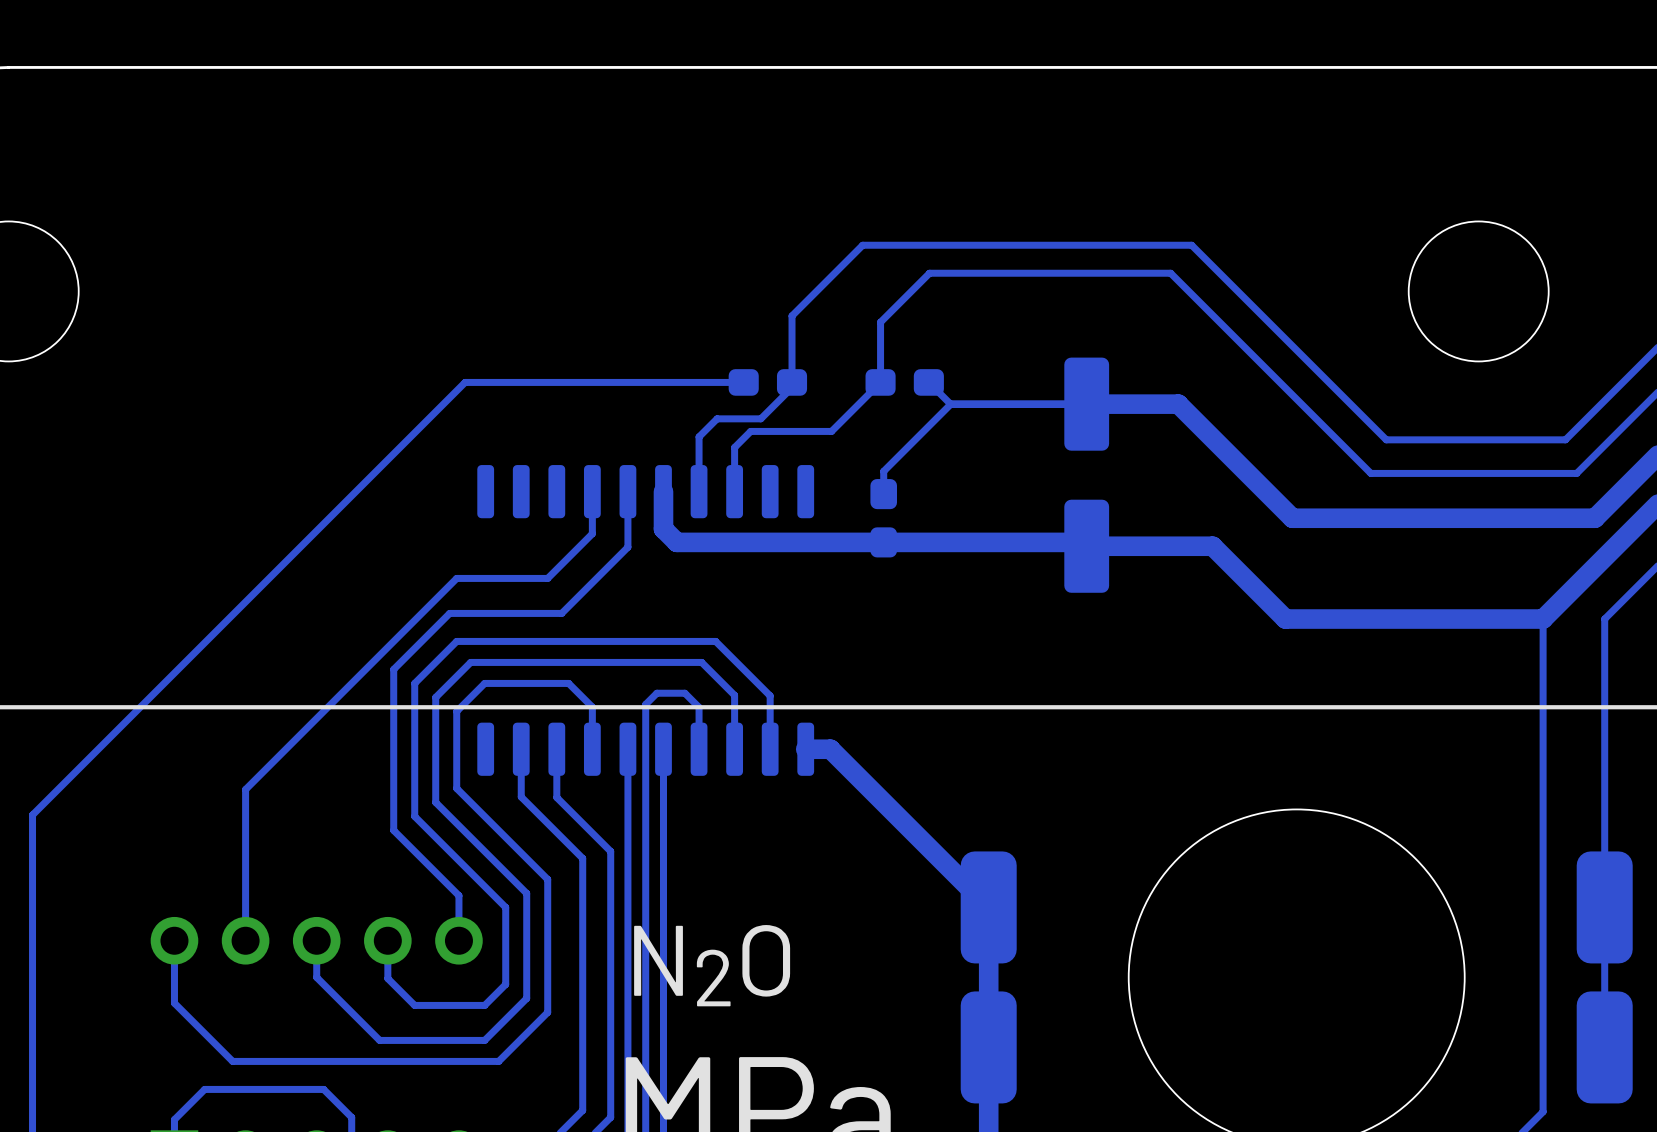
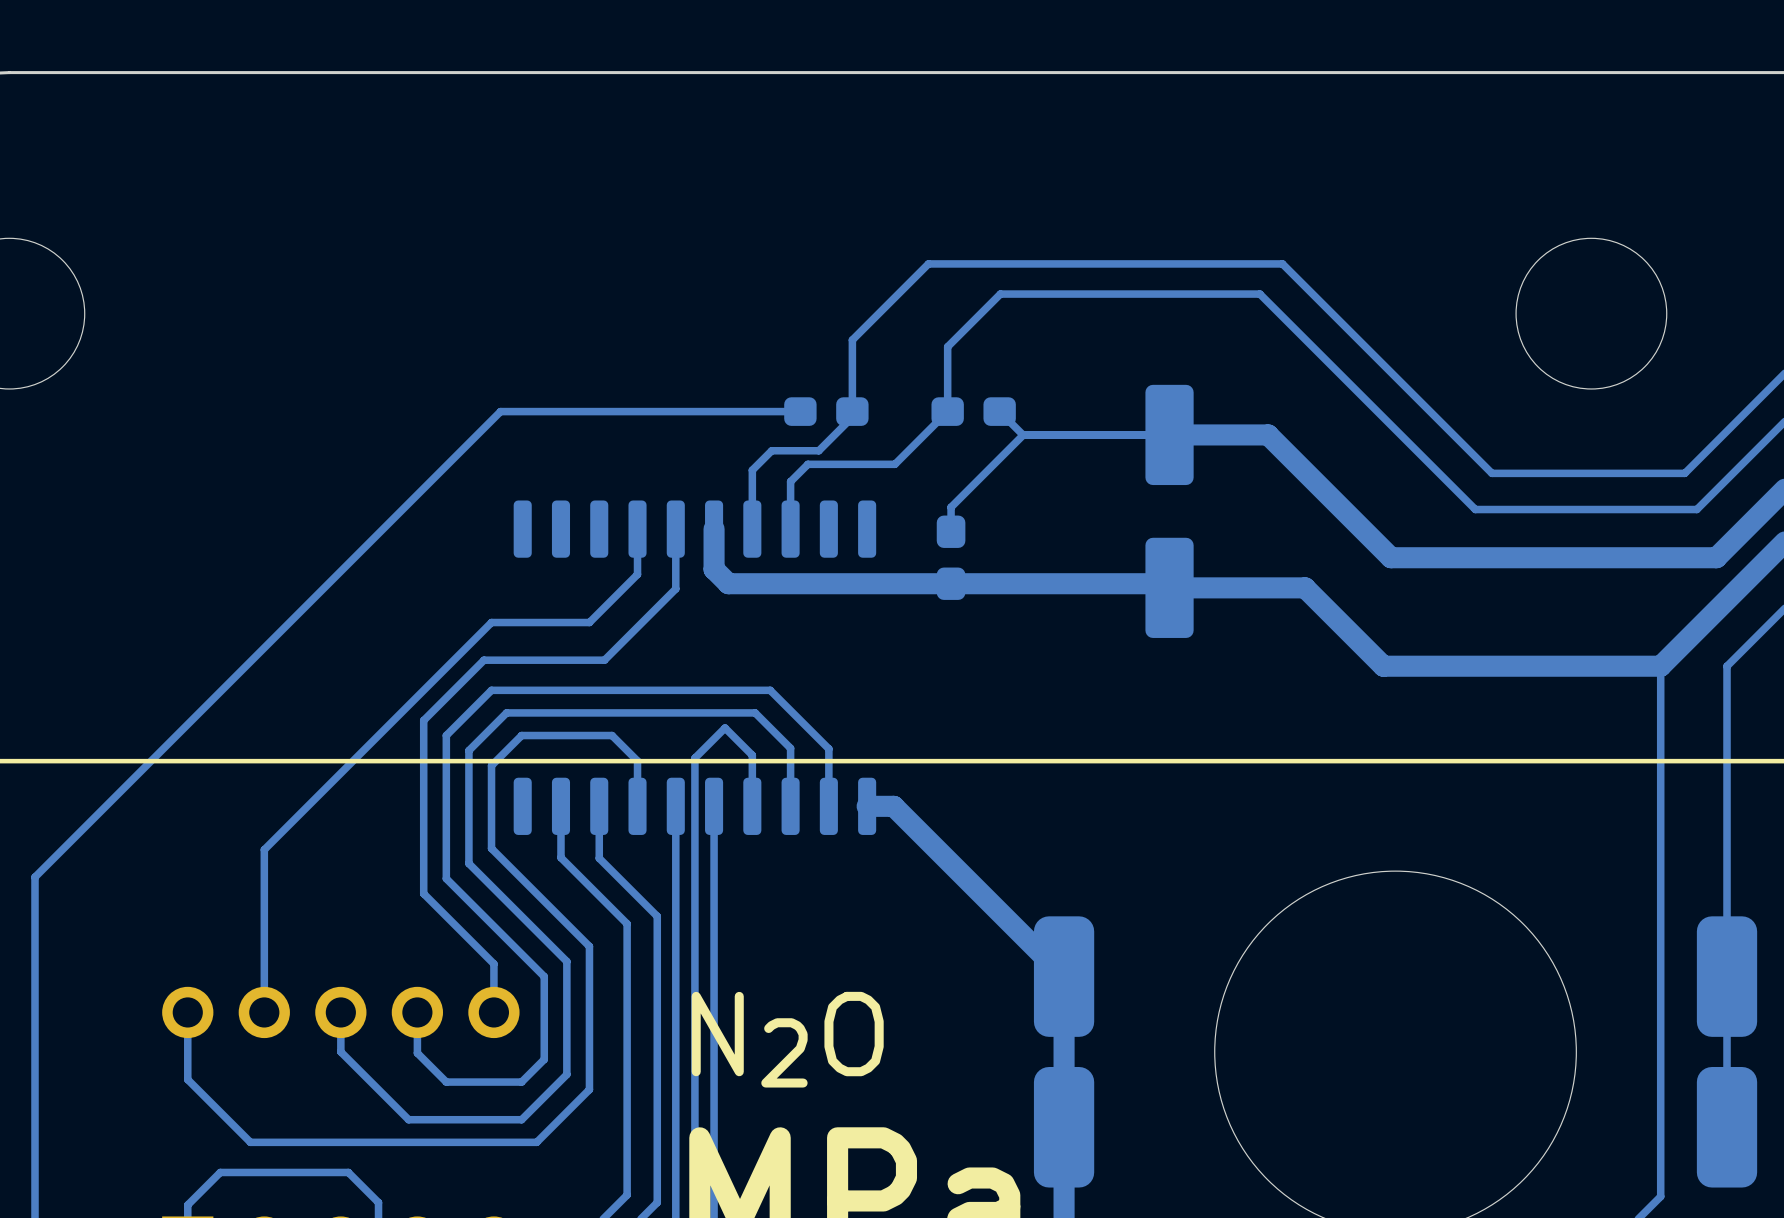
bottom track: (656, 693) (684, 693) (699, 707) -> (706, 746) (725, 727) (752, 755) (752, 761)

